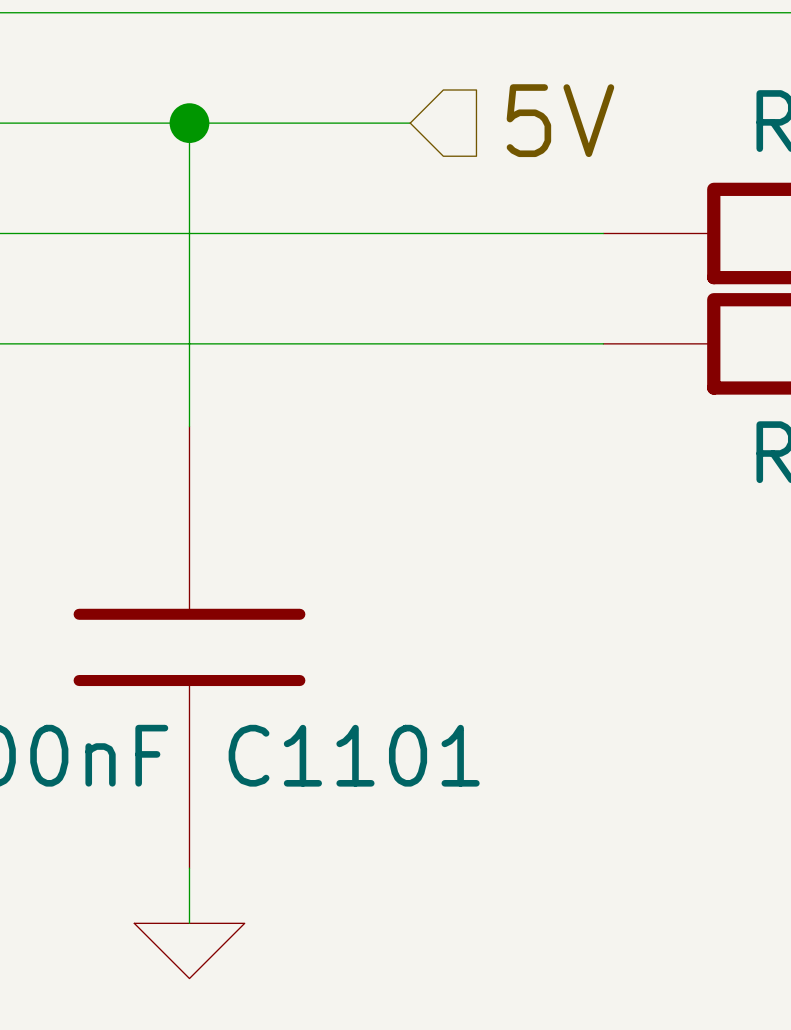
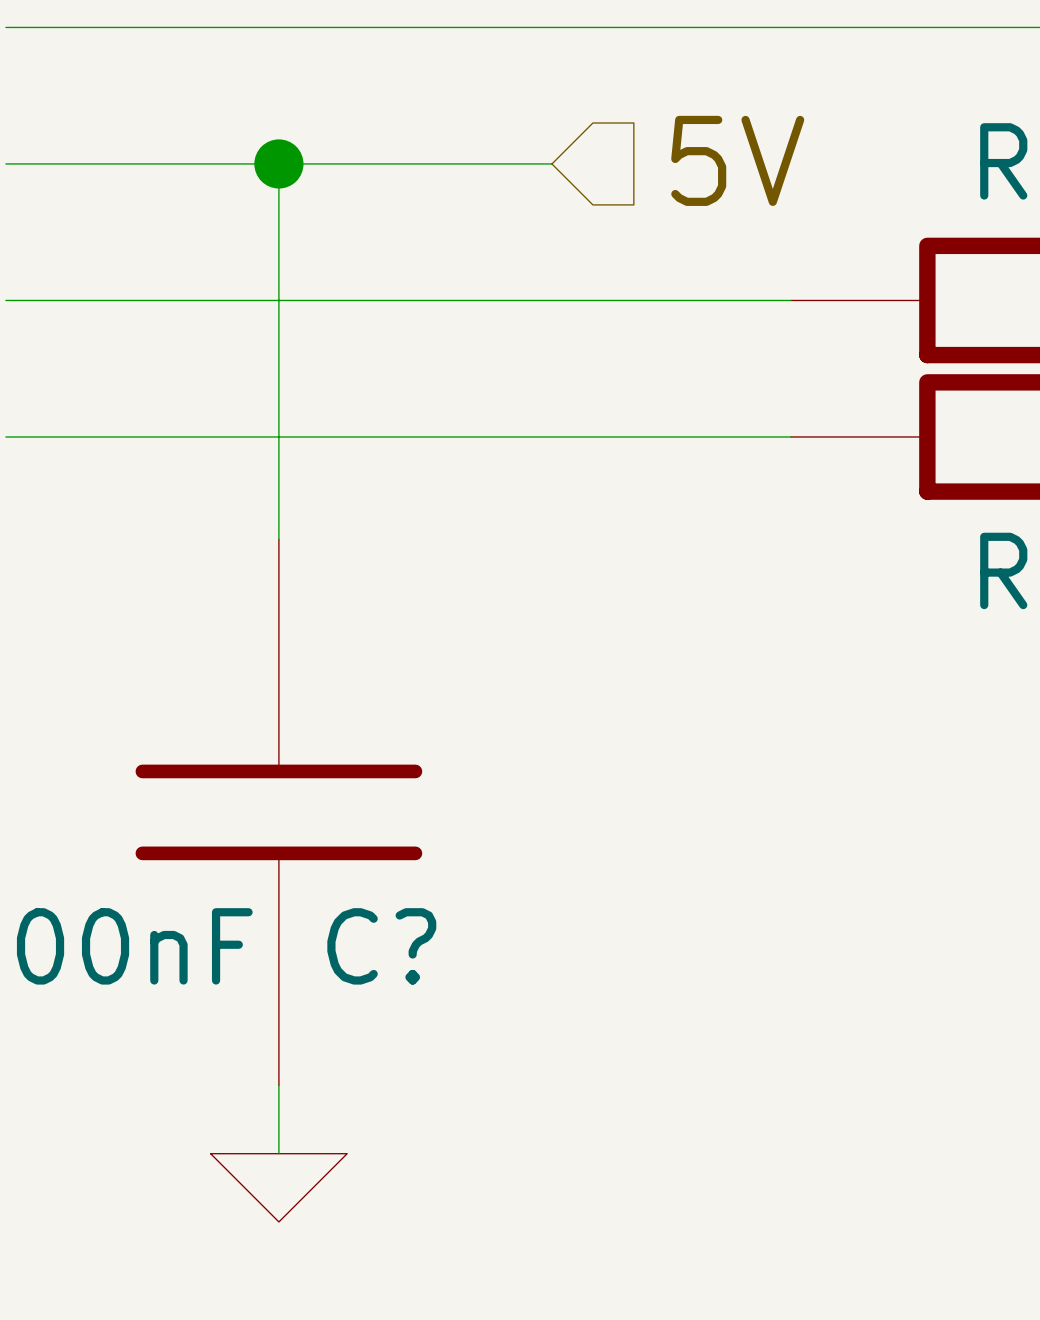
C1101 name: C1101 (354, 755) -> C? (381, 946)

